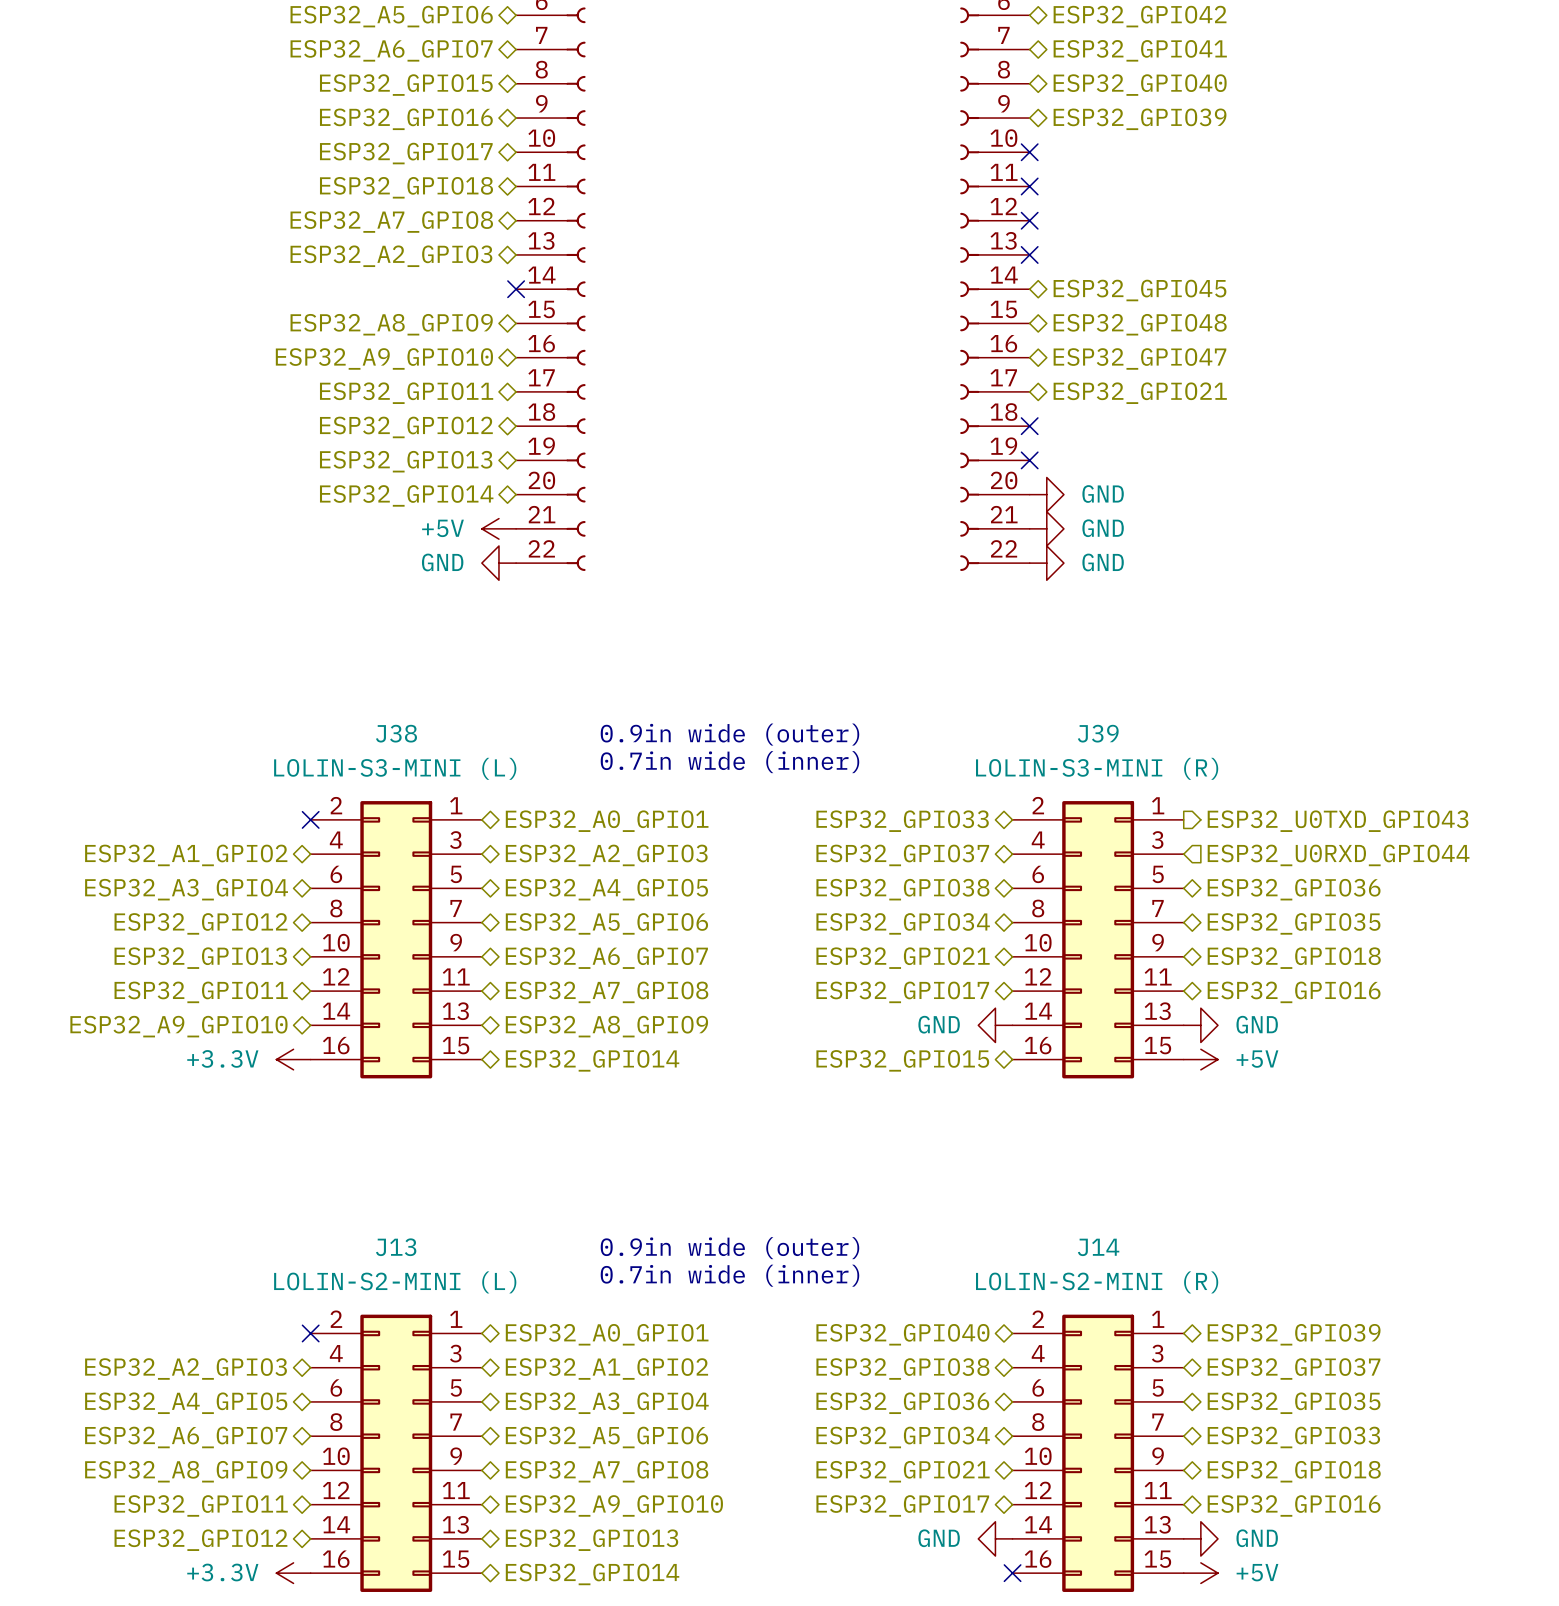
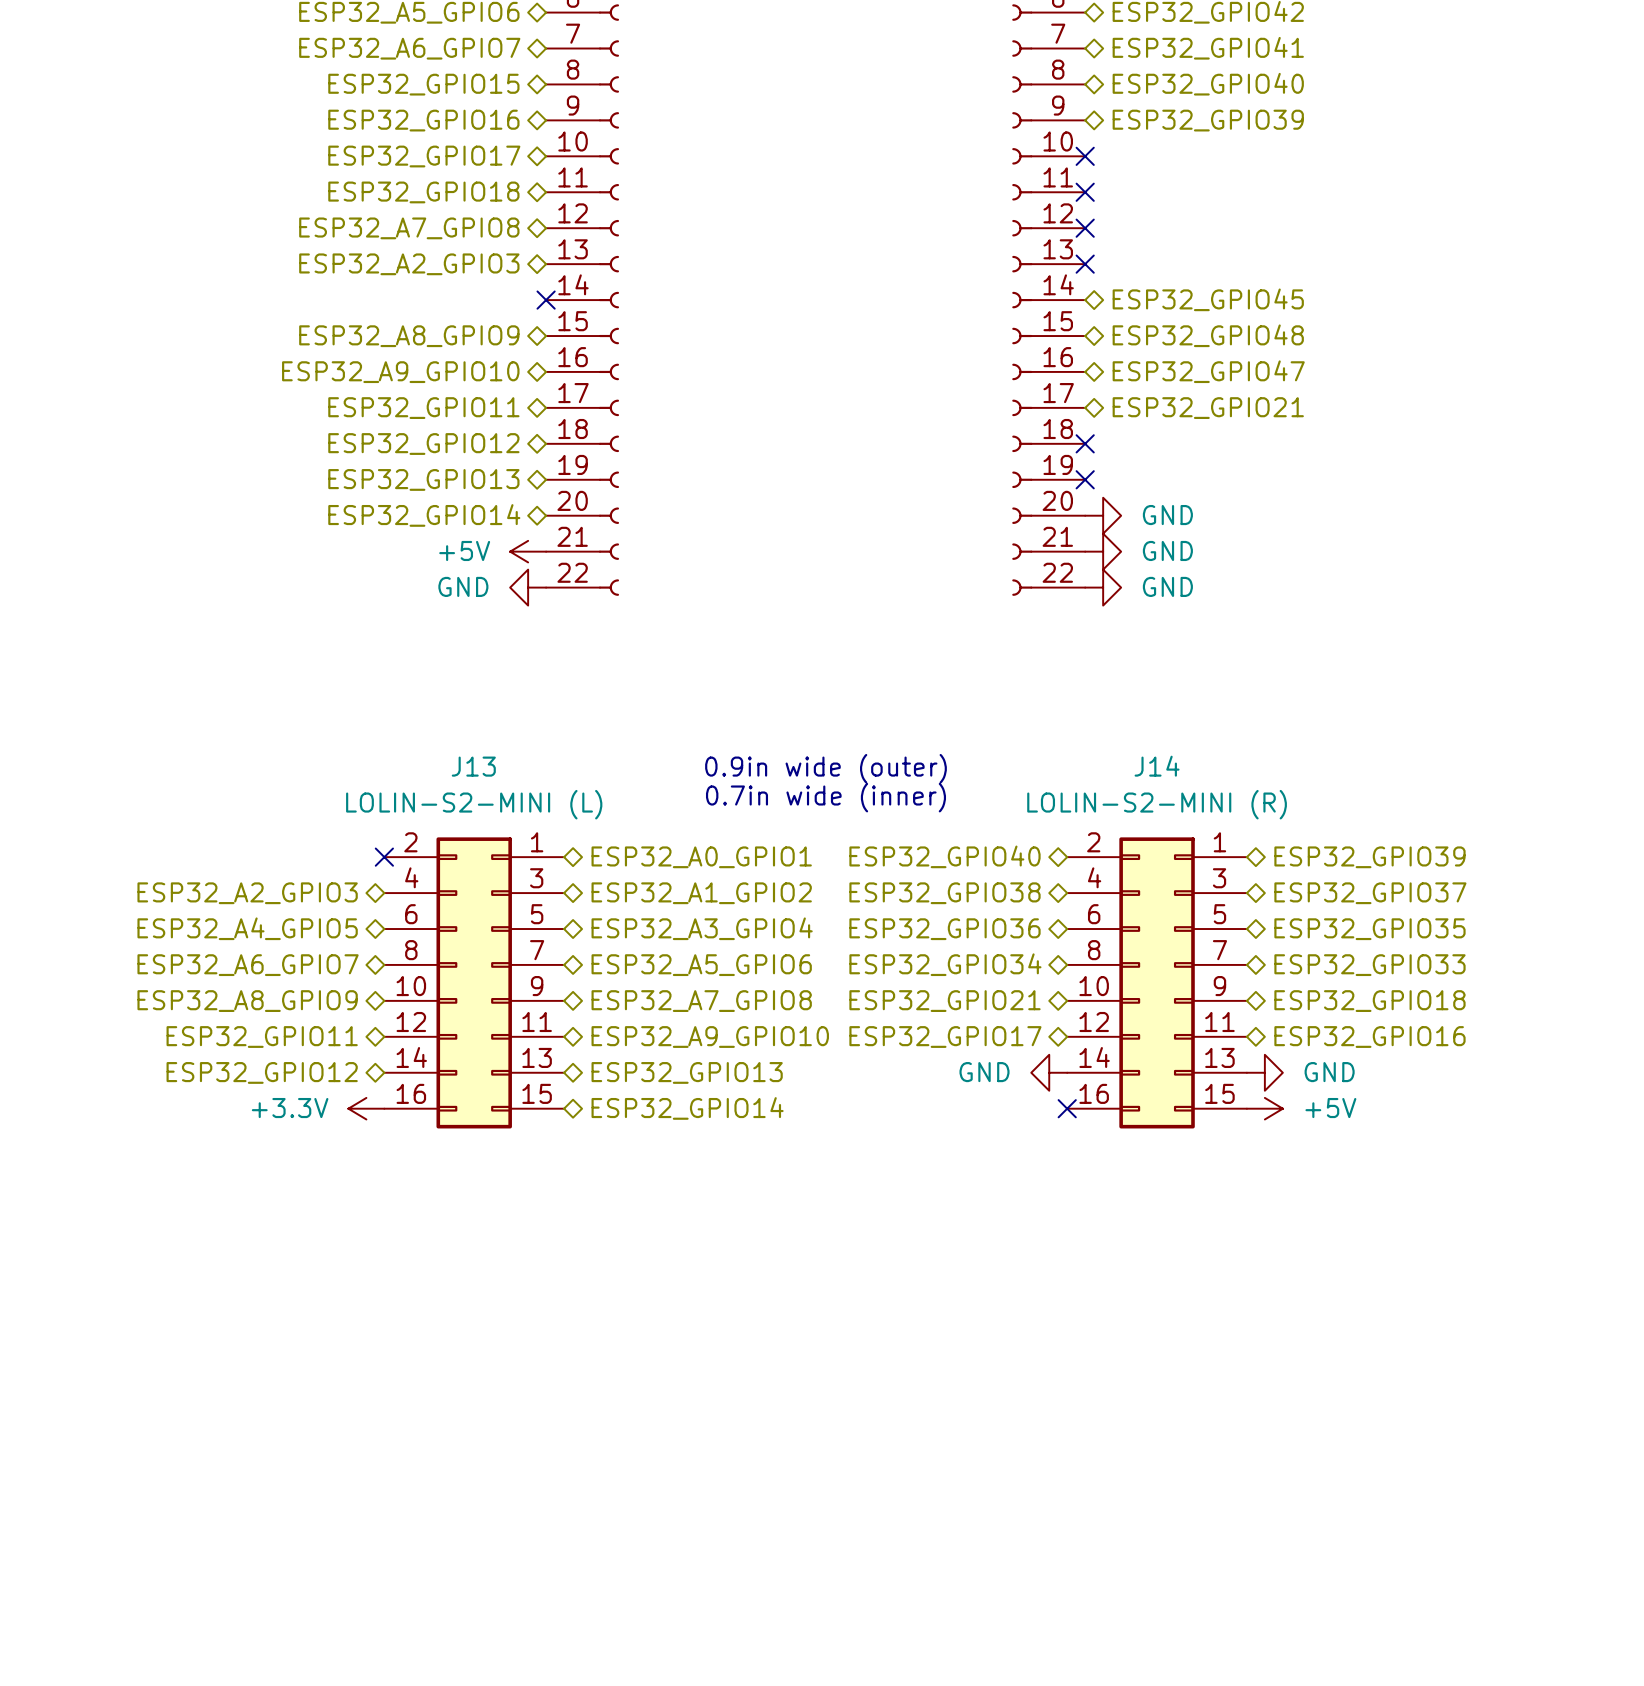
J39 name: J39 (1098, 733) -> J14 (1157, 766)
text position: 0.9in wide (outer) (729, 734) -> 0.9in wide (outer) (825, 768)
text position: 0.7in wide (inner) (729, 762) -> 0.7in wide (inner) (825, 797)
J39 value: LOLIN-S3-MINI (R) (1097, 768) -> LOLIN-S2-MINI (R) (1157, 804)
no-connect mark position: (310, 819) -> (384, 857)
hierarchical label position: ESP32_A0_GPIO1 (607, 821) -> ESP32_A0_GPIO1 (701, 857)
hierarchical label: ESP32_GPIO33 (902, 821) -> ESP32_GPIO40 (944, 856)
hierarchical label shape: output (1338, 821) -> bidirectional (1369, 857)
hierarchical label: ESP32_U0TXD_GPIO43 (1338, 821) -> ESP32_GPIO39 (1369, 857)
hierarchical label: ESP32_A1_GPIO2 (186, 855) -> none
hierarchical label rotation: 0° (606, 855) -> 180° (247, 893)
hierarchical label position: ESP32_A2_GPIO3 (606, 855) -> ESP32_A2_GPIO3 (247, 893)
hierarchical label: none -> ESP32_A1_GPIO2 (701, 893)
hierarchical label: ESP32_GPIO37 (902, 855) -> ESP32_GPIO38 (944, 893)
hierarchical label shape: input (1338, 855) -> bidirectional (1370, 893)
hierarchical label: ESP32_U0RXD_GPIO44 (1338, 855) -> ESP32_GPIO37 (1370, 893)
hierarchical label: ESP32_A3_GPIO4 (186, 889) -> none
hierarchical label rotation: 0° (606, 889) -> 180° (247, 928)
hierarchical label position: ESP32_A4_GPIO5 (606, 889) -> ESP32_A4_GPIO5 (247, 928)
hierarchical label: none -> ESP32_A3_GPIO4 (702, 928)
hierarchical label: ESP32_GPIO38 (902, 889) -> ESP32_GPIO36 (944, 929)
hierarchical label: ESP32_GPIO36 (1294, 889) -> ESP32_GPIO35 (1369, 929)
hierarchical label position: ESP32_GPIO12 (200, 923) -> ESP32_GPIO12 (262, 1072)
hierarchical label position: ESP32_A5_GPIO6 (606, 923) -> ESP32_A5_GPIO6 (701, 965)
hierarchical label: ESP32_GPIO35 (1294, 923) -> ESP32_GPIO33 (1369, 965)
J38: LOLIN-S3-MINI (L) (396, 939) -> none
hierarchical label: ESP32_GPIO13 (200, 958) -> none
hierarchical label rotation: 0° (606, 958) -> 180° (248, 965)
hierarchical label position: ESP32_A6_GPIO7 (606, 958) -> ESP32_A6_GPIO7 (248, 965)
hierarchical label position: ESP32_GPIO11 (201, 992) -> ESP32_GPIO11 (262, 1037)
hierarchical label position: ESP32_A7_GPIO8 (607, 992) -> ESP32_A7_GPIO8 (701, 1001)
hierarchical label: none -> ESP32_A9_GPIO10 (710, 1037)
hierarchical label: ESP32_A9_GPIO10 (178, 1026) -> none
hierarchical label rotation: 0° (606, 1026) -> 180° (247, 1001)
hierarchical label position: ESP32_A8_GPIO9 (606, 1026) -> ESP32_A8_GPIO9 (247, 1001)
hierarchical label: none -> ESP32_GPIO13 (687, 1072)
power symbol position: +3.3V (293, 1059) -> +3.3V (366, 1108)
no-connect mark: none -> (1067, 1108)
hierarchical label position: ESP32_GPIO14 (592, 1060) -> ESP32_GPIO14 (687, 1108)
hierarchical label: ESP32_GPIO15 (902, 1060) -> none
text: 0.9in wide (outer) (729, 1248) -> none
text: 0.7in wide (inner) (729, 1275) -> none
no-connect mark: (310, 1333) -> none
hierarchical label: ESP32_A0_GPIO1 (607, 1334) -> none
hierarchical label: ESP32_GPIO40 (902, 1334) -> none
hierarchical label: ESP32_GPIO39 (1294, 1334) -> none
hierarchical label: ESP32_A2_GPIO3 (186, 1369) -> none
hierarchical label: ESP32_A1_GPIO2 (606, 1369) -> none
hierarchical label: ESP32_GPIO38 (902, 1369) -> none
hierarchical label: ESP32_GPIO37 (1294, 1369) -> none
hierarchical label: ESP32_A4_GPIO5 (186, 1403) -> none
hierarchical label: ESP32_A3_GPIO4 (607, 1403) -> none
hierarchical label: ESP32_GPIO36 (902, 1403) -> none
hierarchical label: ESP32_GPIO35 (1294, 1403) -> none
hierarchical label: ESP32_A6_GPIO7 (186, 1437) -> none
hierarchical label: ESP32_A5_GPIO6 (606, 1437) -> none
hierarchical label: ESP32_GPIO34 (903, 1437) -> none
hierarchical label: ESP32_GPIO33 (1293, 1437) -> none
J13 position: (396, 1453) -> (474, 982)
J14: LOLIN-S2-MINI (R) (1098, 1453) -> none
hierarchical label: ESP32_A8_GPIO9 (186, 1471) -> none
hierarchical label: ESP32_A7_GPIO8 (607, 1471) -> none
hierarchical label: ESP32_GPIO21 (903, 1471) -> none
hierarchical label: ESP32_GPIO18 (1294, 1471) -> none
hierarchical label: ESP32_GPIO11 (201, 1505) -> none
hierarchical label: ESP32_A9_GPIO10 (614, 1505) -> none
hierarchical label: ESP32_GPIO17 (902, 1505) -> none
hierarchical label: ESP32_GPIO16 (1294, 1505) -> none
power symbol: GND (995, 1538) -> none
power symbol: GND (1200, 1538) -> none
hierarchical label: ESP32_GPIO12 (200, 1540) -> none
hierarchical label: ESP32_GPIO13 (591, 1540) -> none
power symbol: +3.3V (293, 1573) -> none
no-connect mark: (1012, 1573) -> none
power symbol: +5V (1200, 1573) -> none
hierarchical label: ESP32_GPIO14 (592, 1574) -> none

